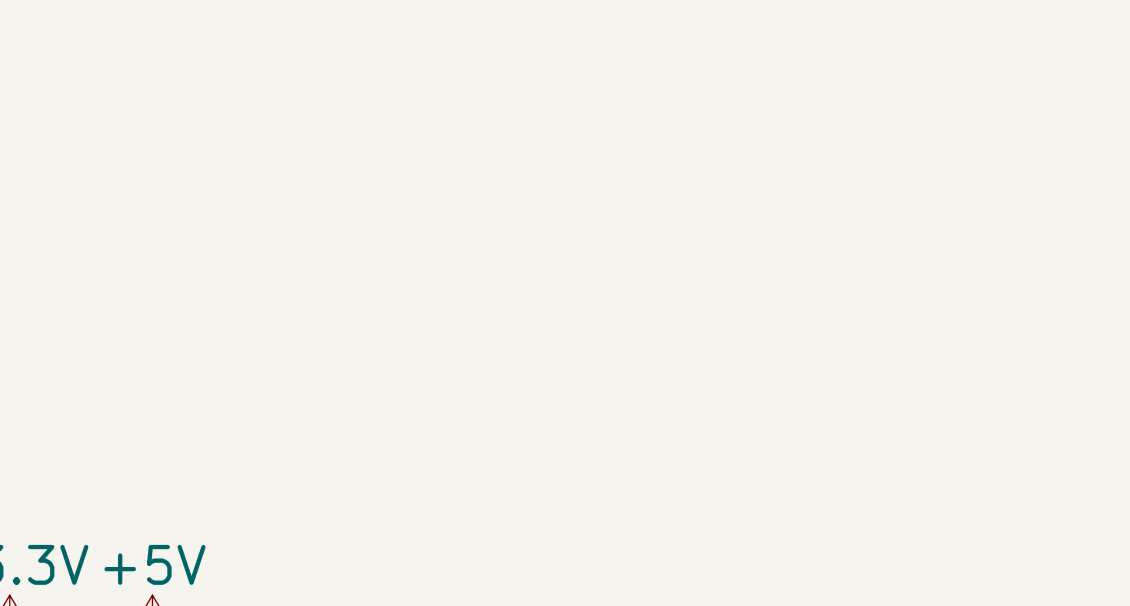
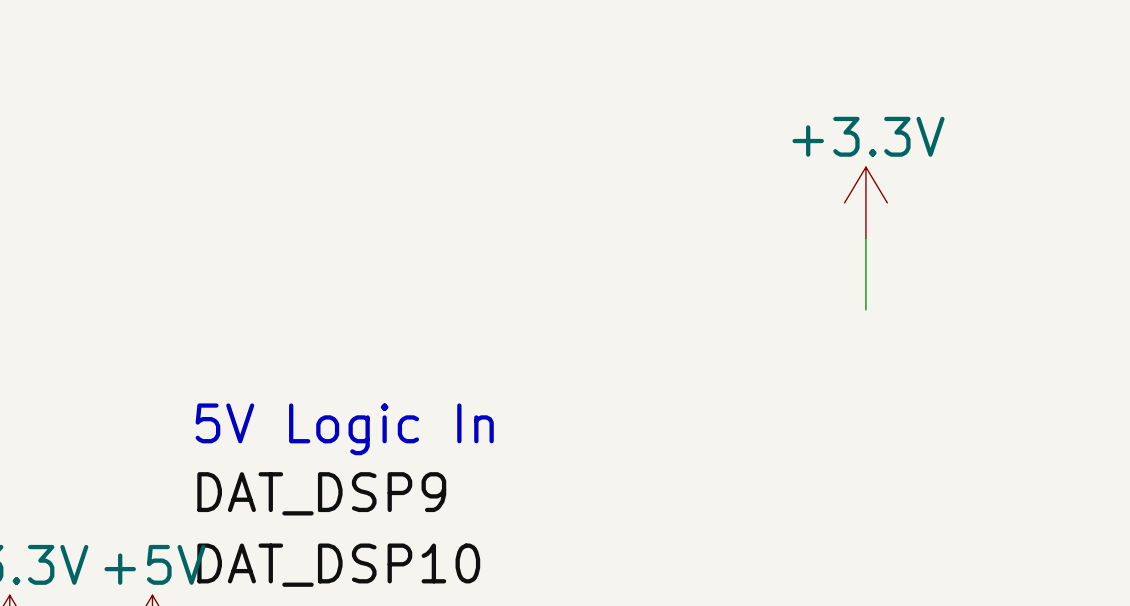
power symbol: none -> +3.3V (865, 202)
wire: none -> (865, 238) (865, 309)
text: none -> 5V Logic In (344, 429)
label: none -> DAT_DSP9 (321, 493)
label: none -> DAT_DSP10 (338, 565)

